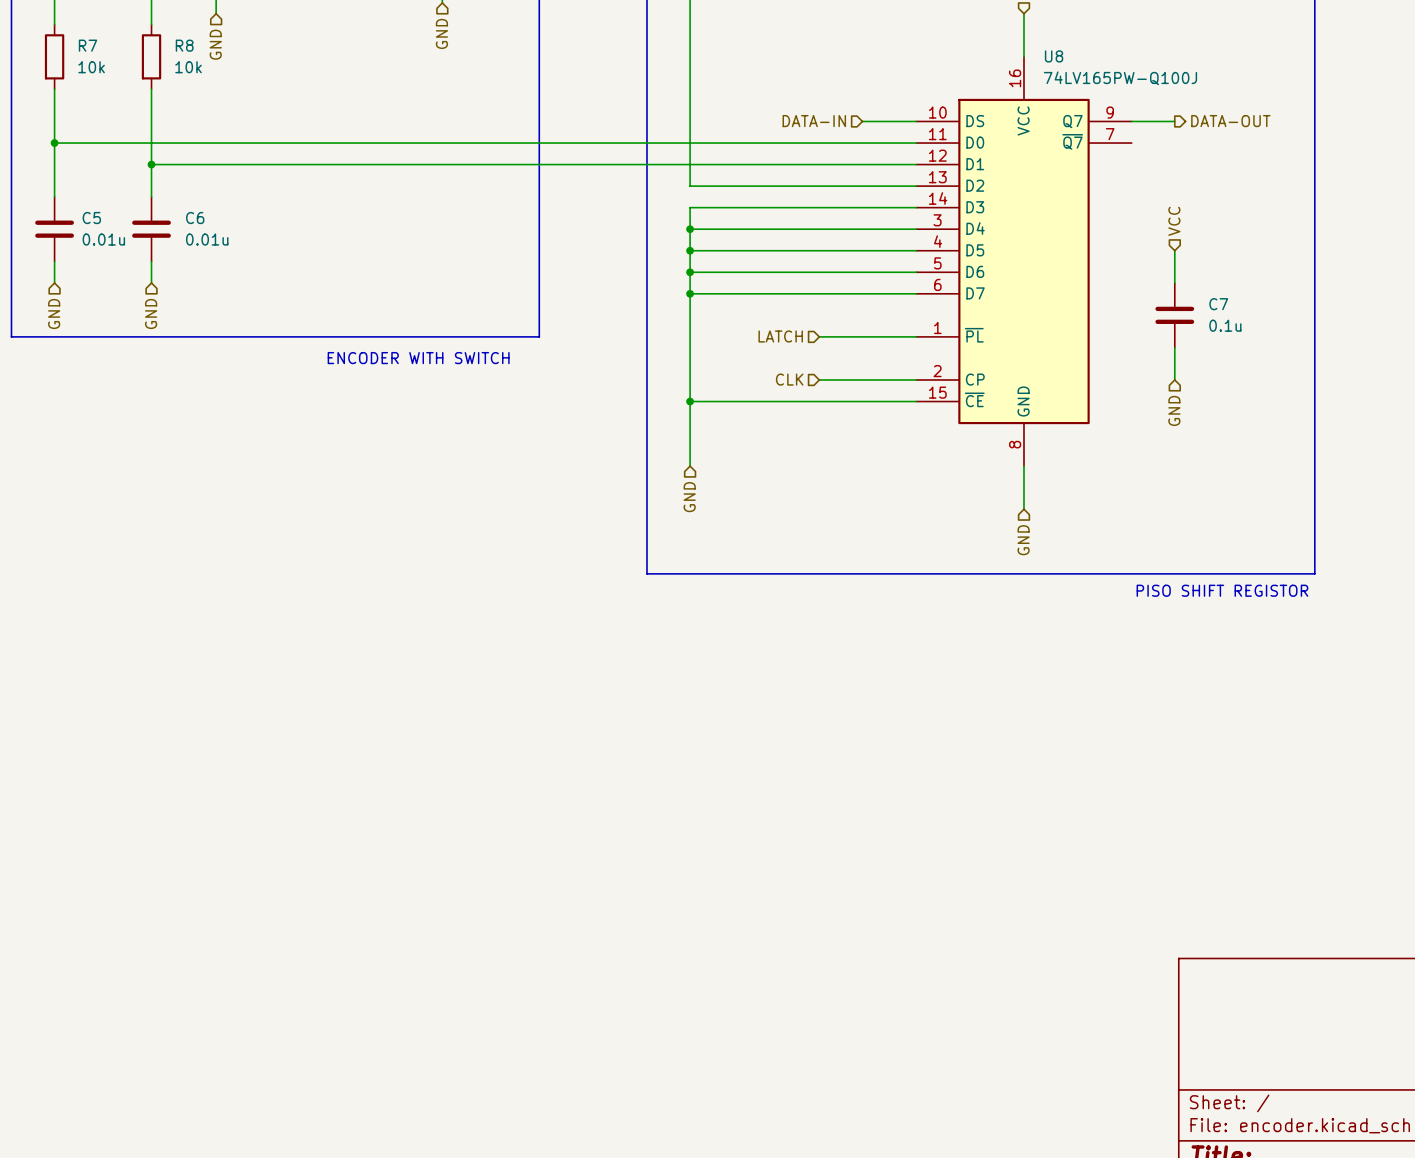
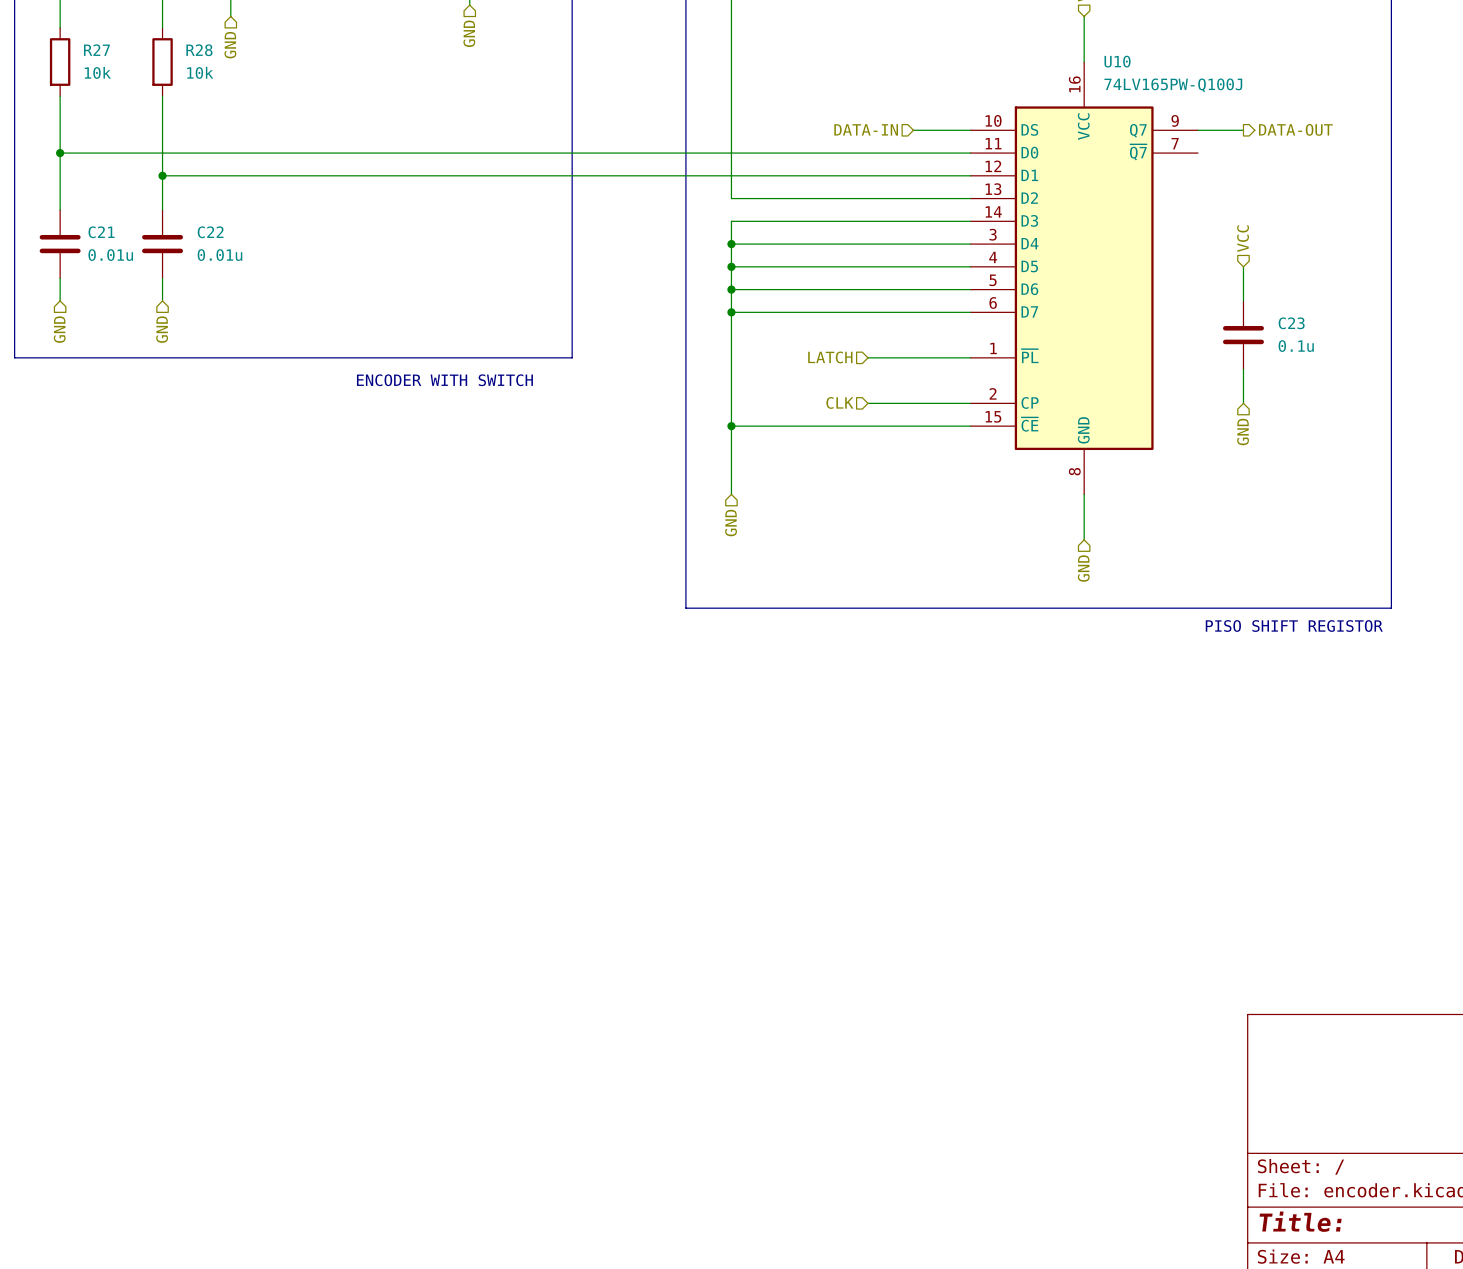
R7 name: R7 (87, 45) -> R27 (96, 50)
R8 name: R8 (184, 45) -> R28 (199, 50)
U8 name: U8 (1054, 56) -> U10 (1117, 61)
C5 name: C5 (91, 218) -> C21 (101, 232)
C6 name: C6 (195, 218) -> C22 (210, 232)
C7 name: C7 (1218, 304) -> C23 (1291, 323)

